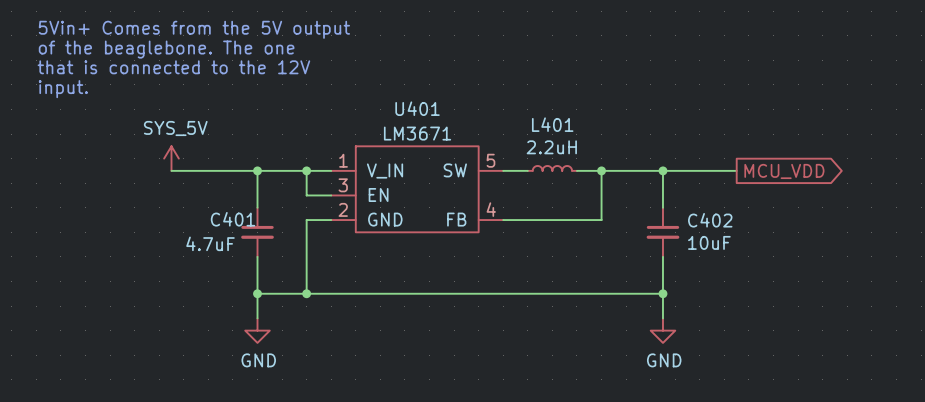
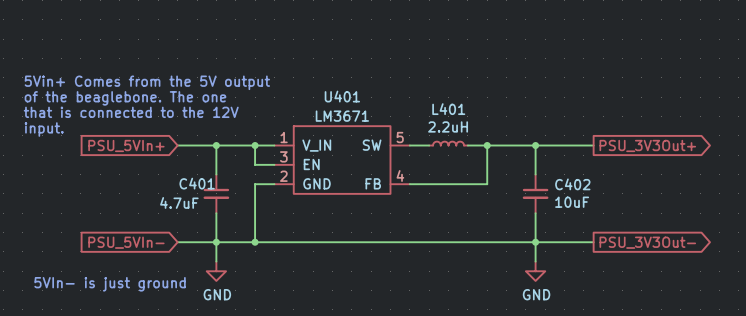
text position: 5Vin+ Comes from the 5V output (194, 29) -> 5Vin+ Comes from the 5V output (147, 82)
text position: of the beaglebone. The one (166, 49) -> of the beaglebone. The one (125, 98)
text position: that is connected to the 12V (173, 67) -> that is connected to the 12V (131, 112)
text position: input. (63, 89) -> input. (44, 129)
power symbol: SYS_5V (171, 158) -> none
wire: (171, 170) (208, 170) -> none
global label: none -> PSU_5VIn+ (126, 145)
global label: MCU_VDD (784, 171) -> PSU_3V3Out+ (647, 145)
wire: none -> (177, 242) (216, 242)
wire: none -> (535, 242) (593, 242)
global label: none -> PSU_5VIn- (126, 242)
global label: none -> PSU_3V3Out- (647, 242)
text: none -> 5VIn- is just ground (110, 284)

